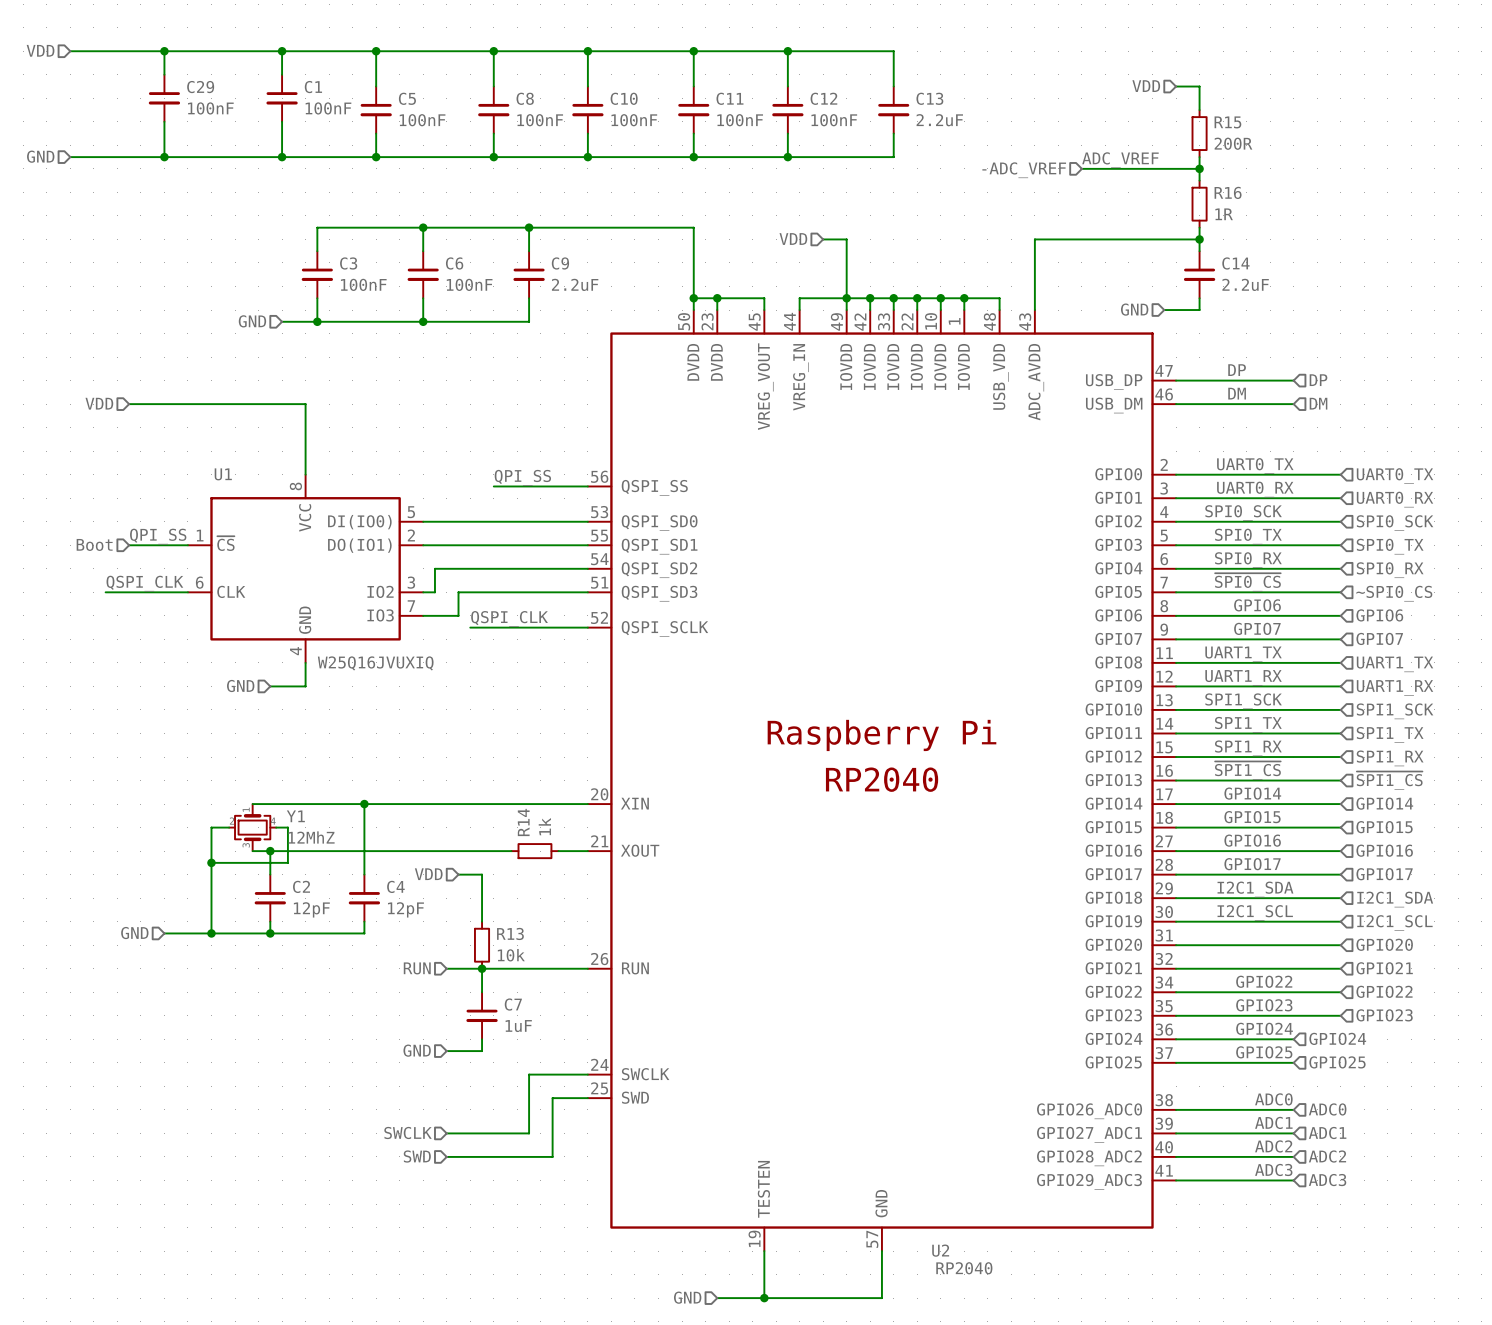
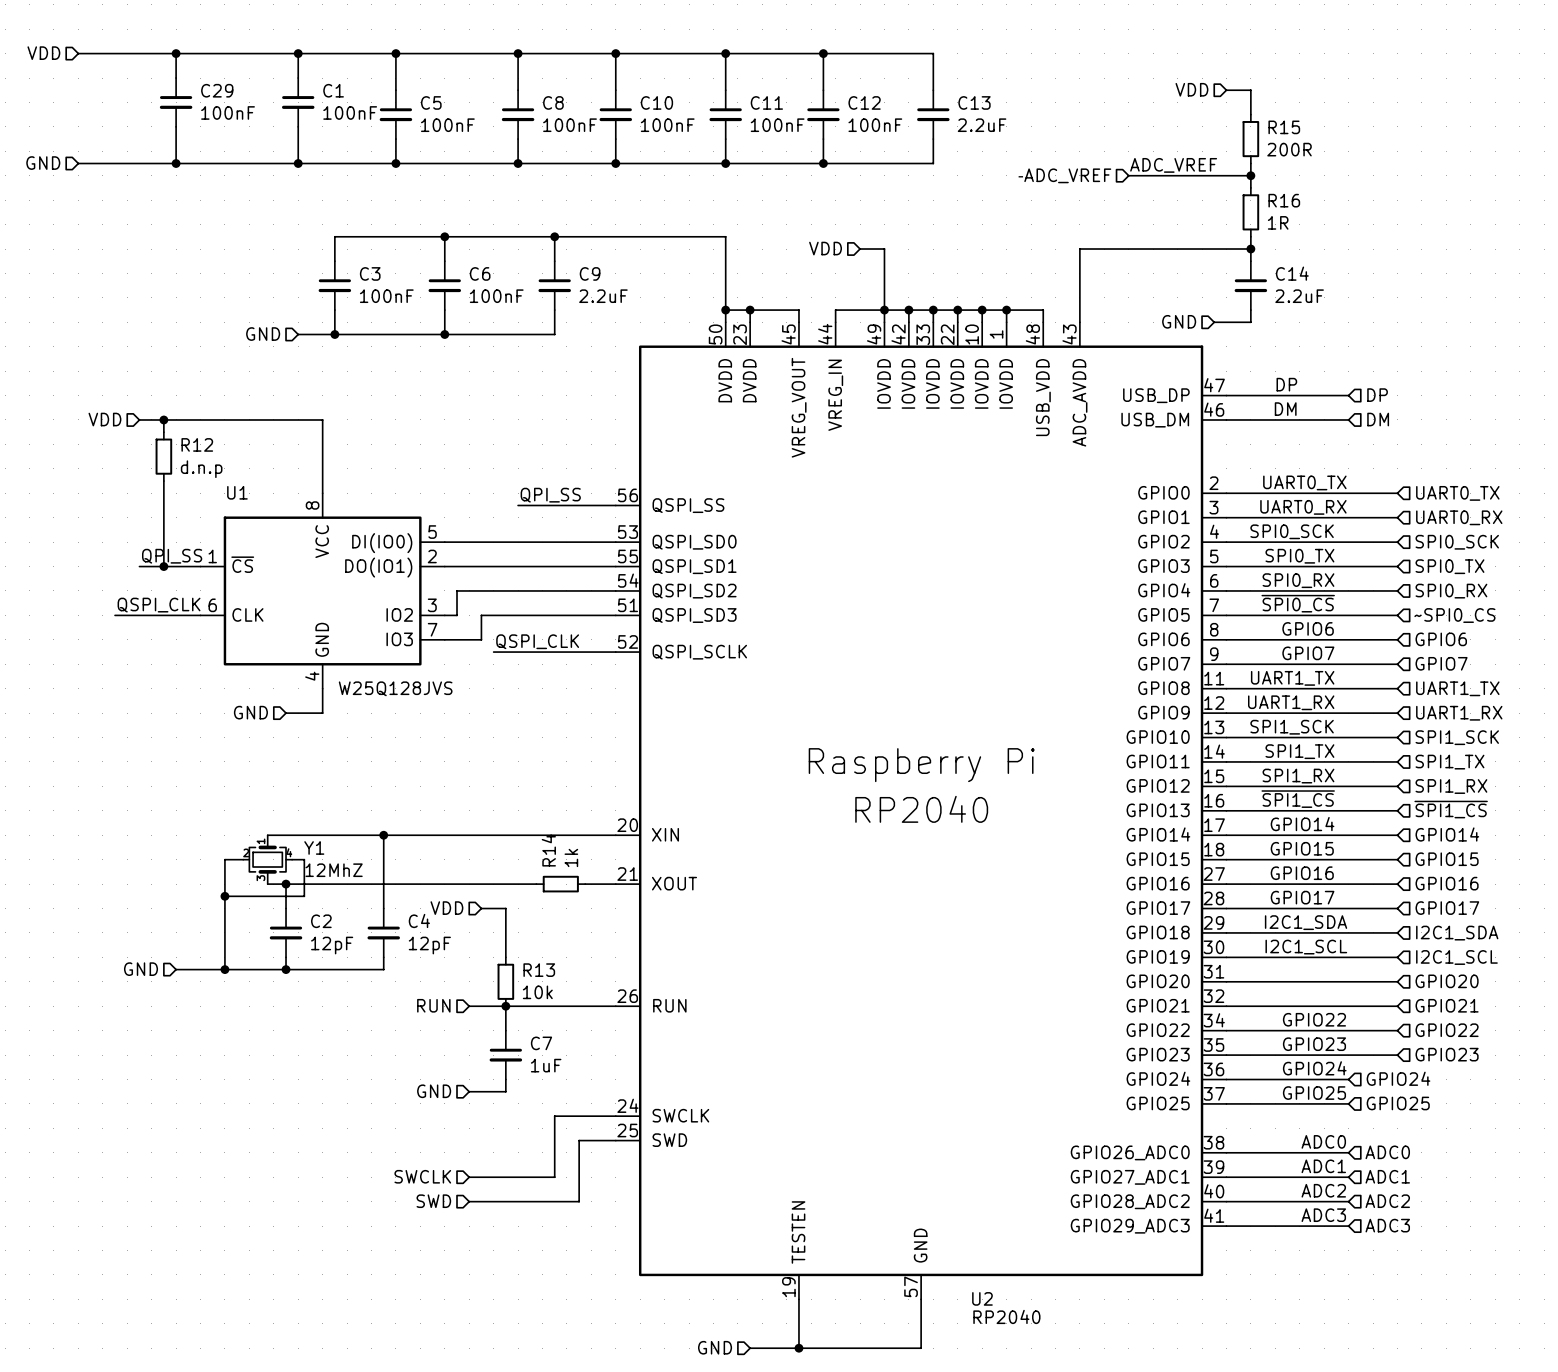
wire: none -> (163, 419) (163, 432)
junction: none -> (163, 419)
R12: none -> d.n.p (163, 456)
wire: none -> (163, 481) (163, 566)
hierarchical label: Boot (94, 544) -> none
junction: none -> (163, 566)
U1 value: W25Q16JVUXIQ (375, 663) -> W25Q128JVS (395, 688)

